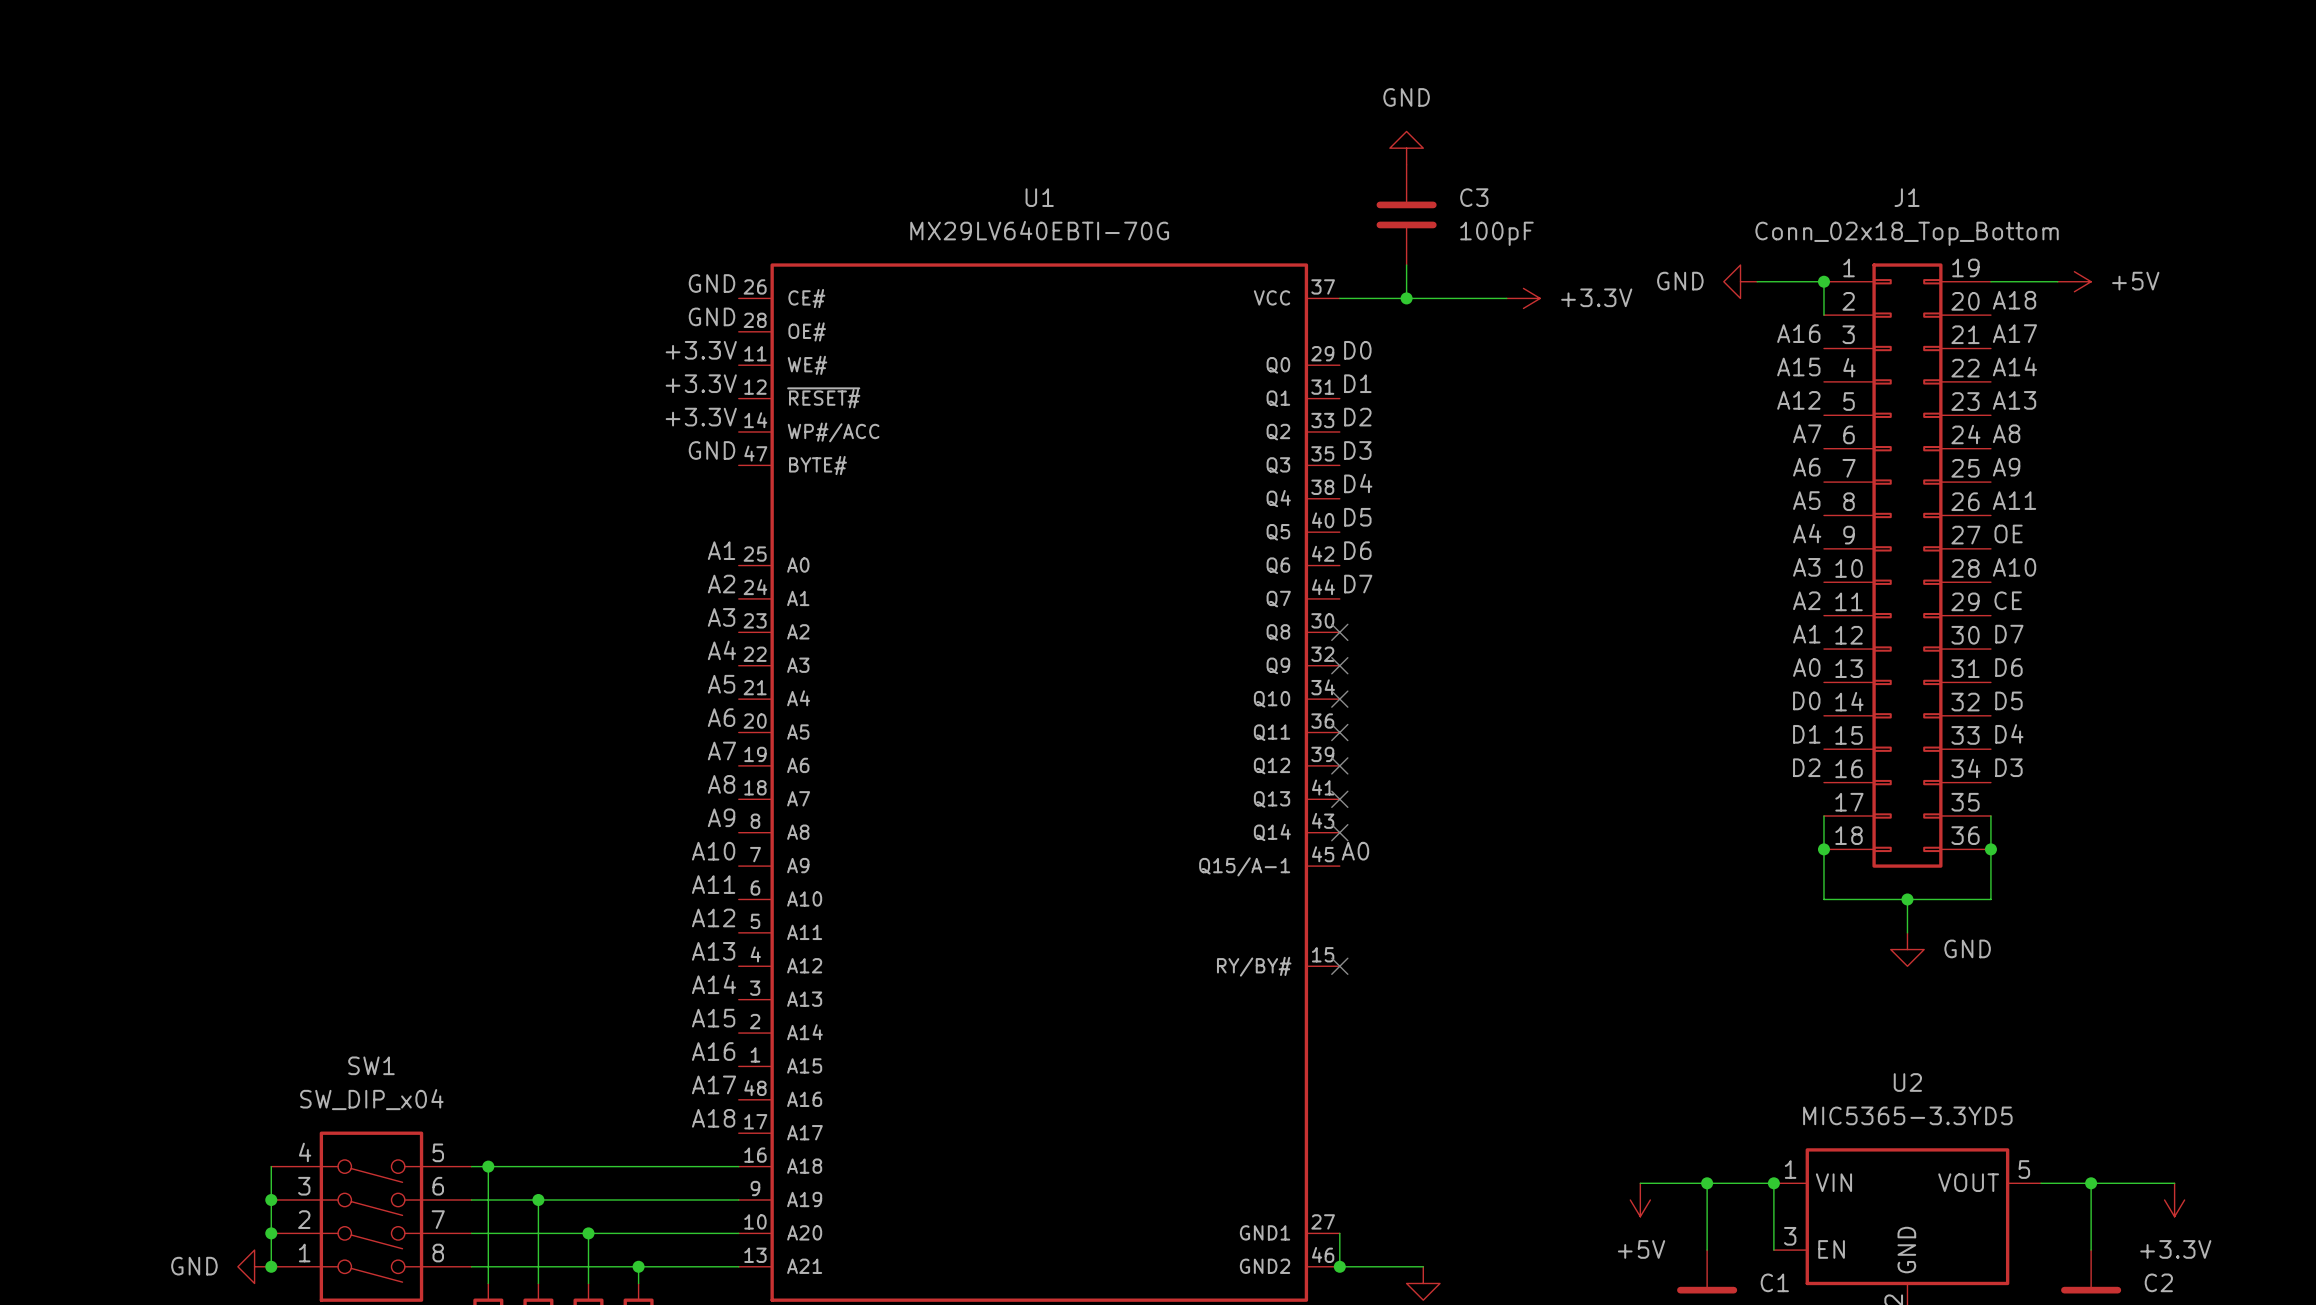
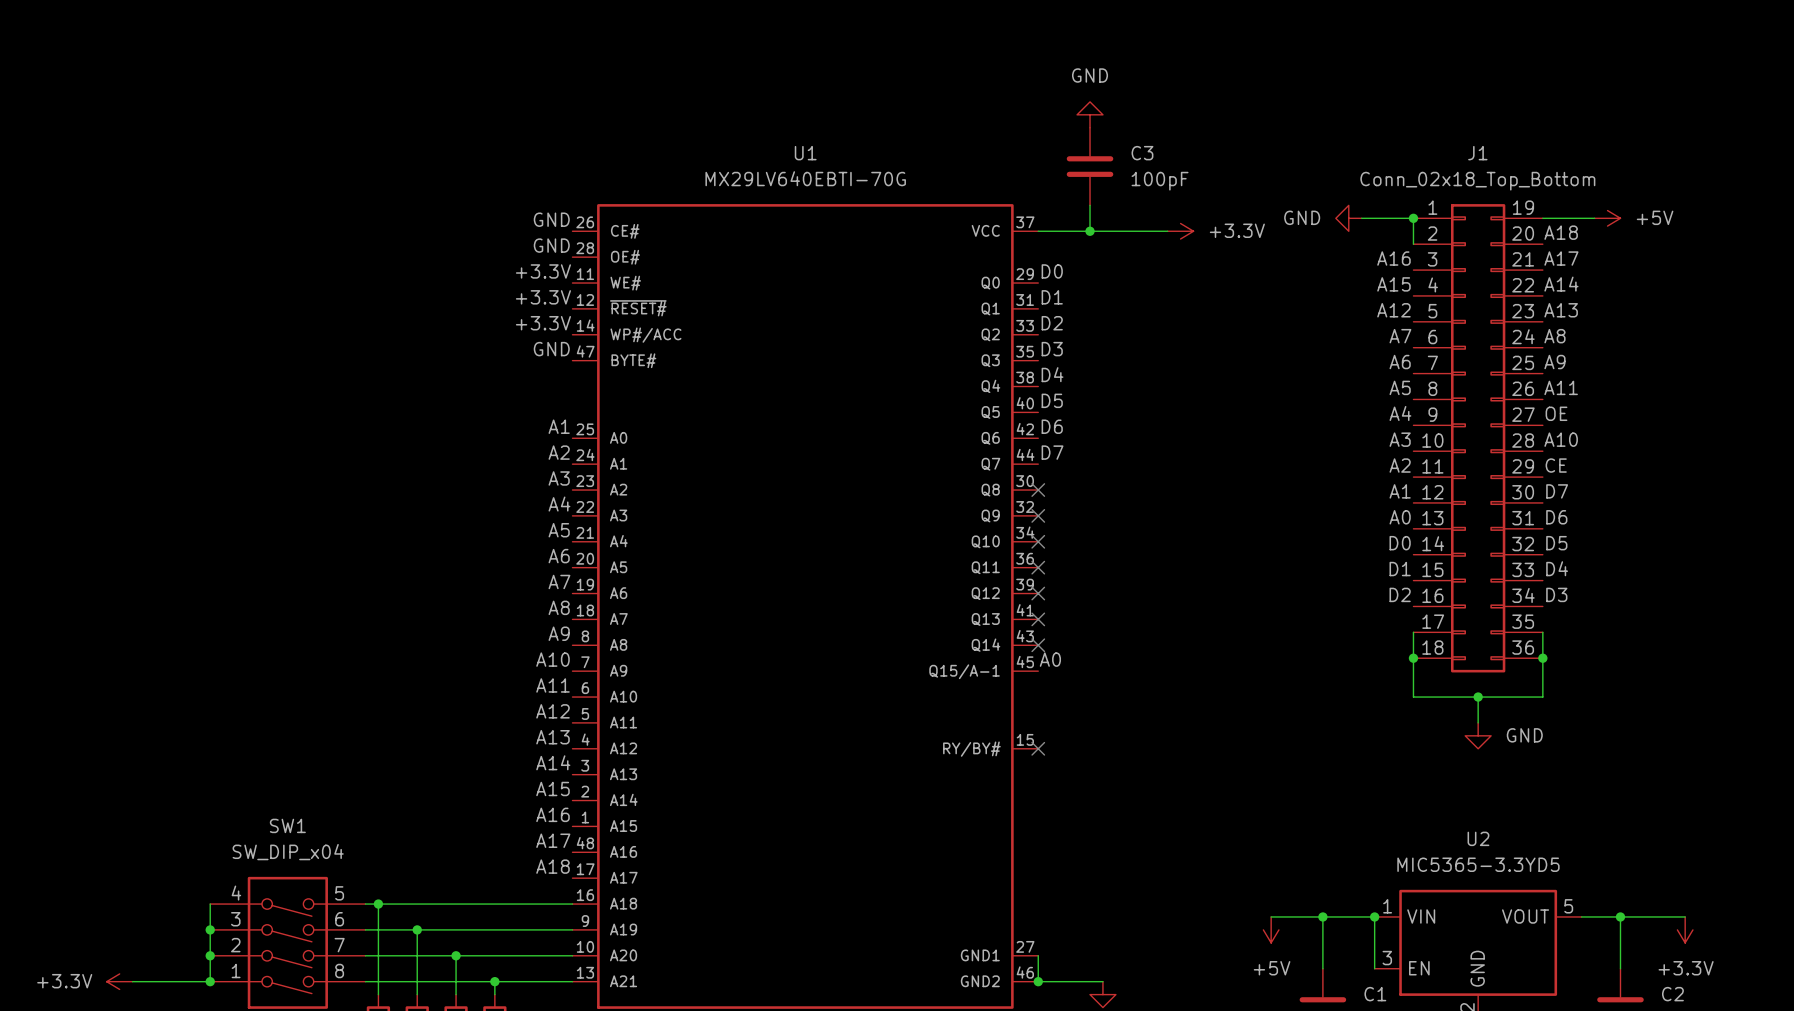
power symbol: none -> +3.3V (119, 981)
wire: none -> (132, 981) (210, 981)
power symbol: GND (254, 1266) -> none

